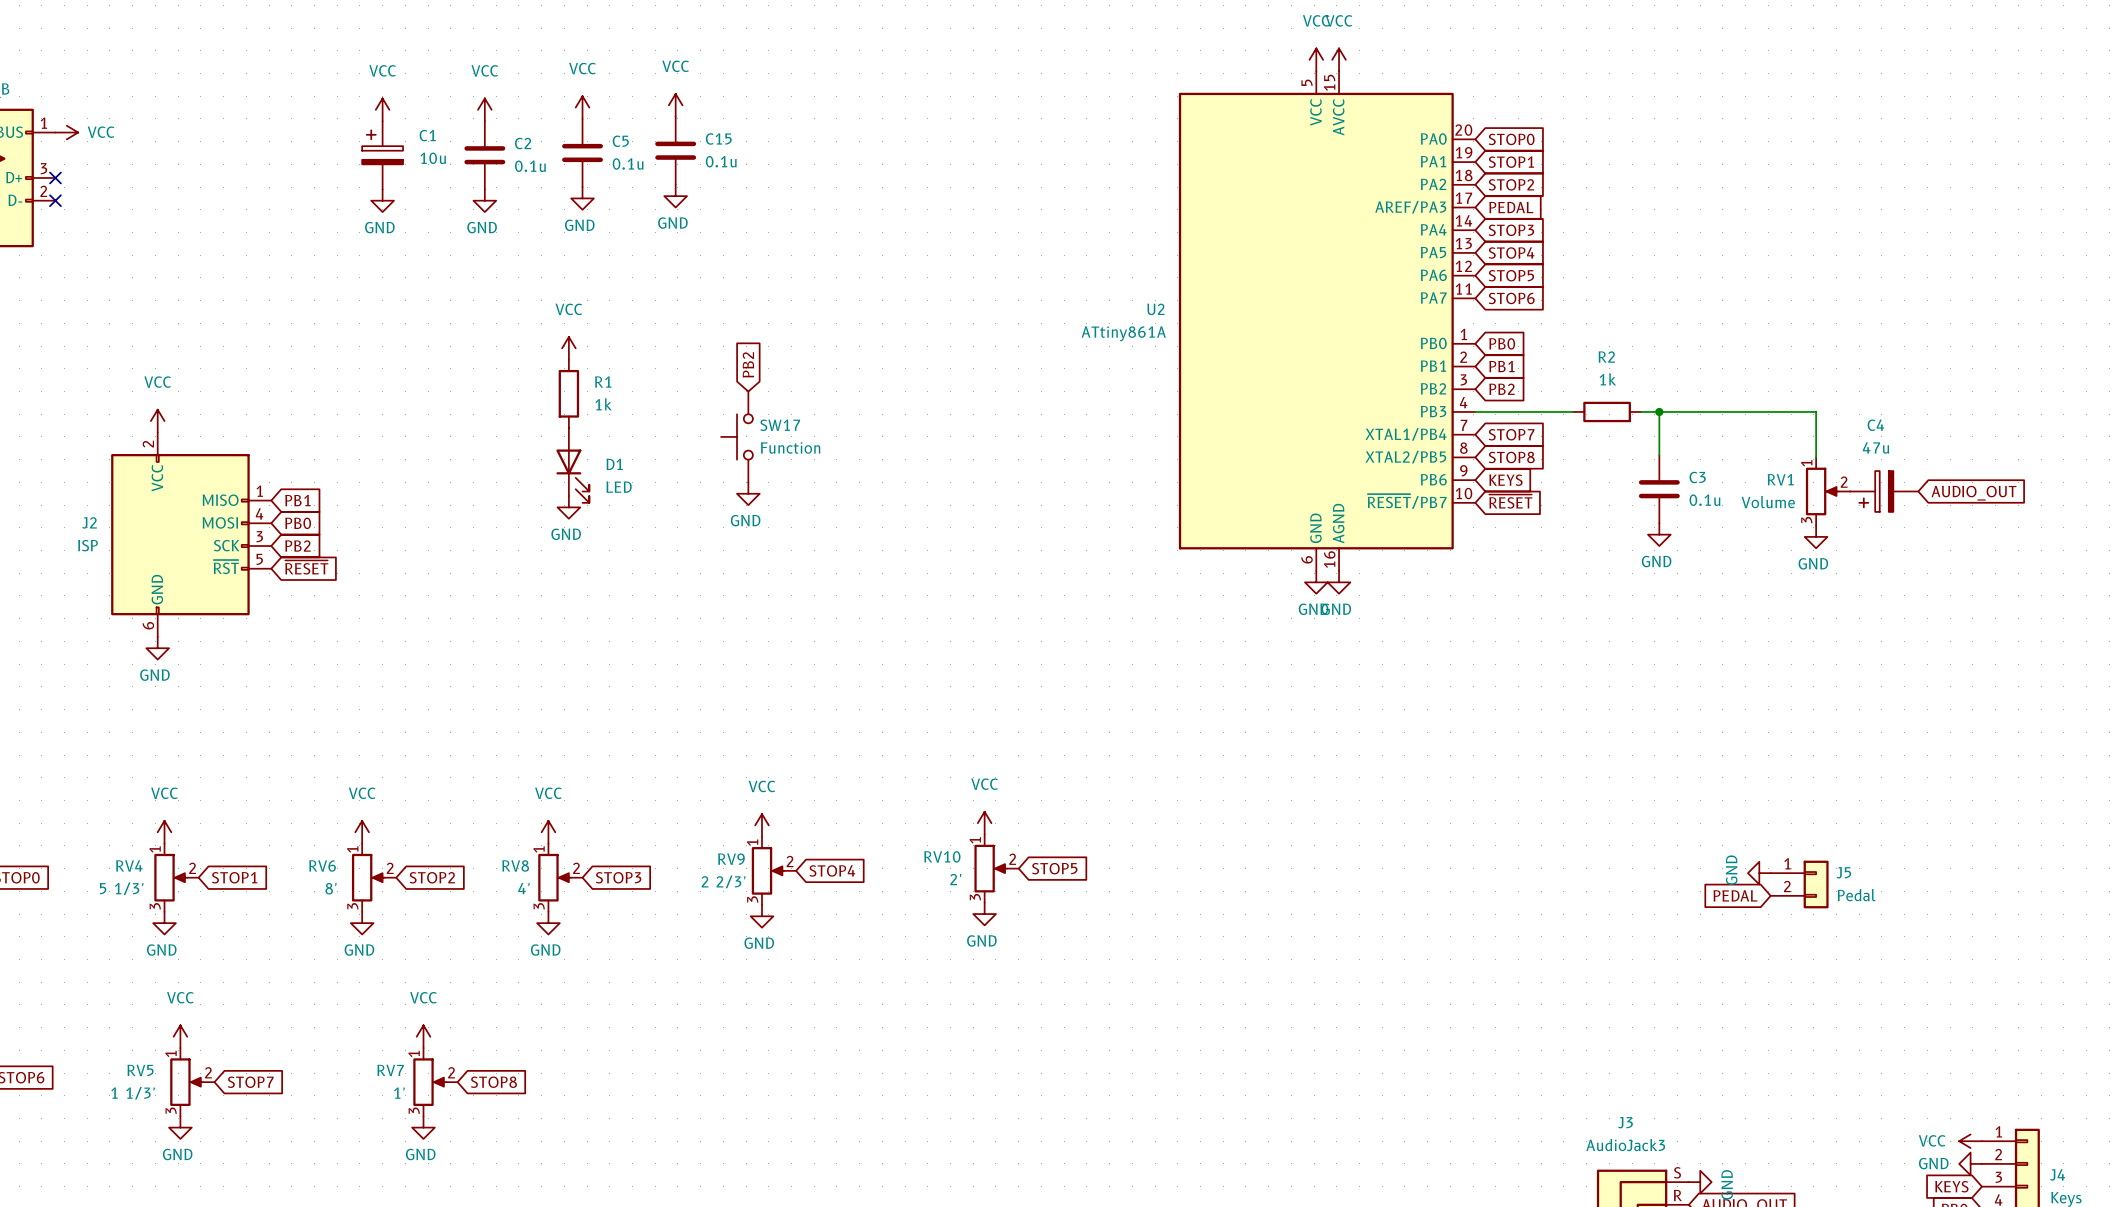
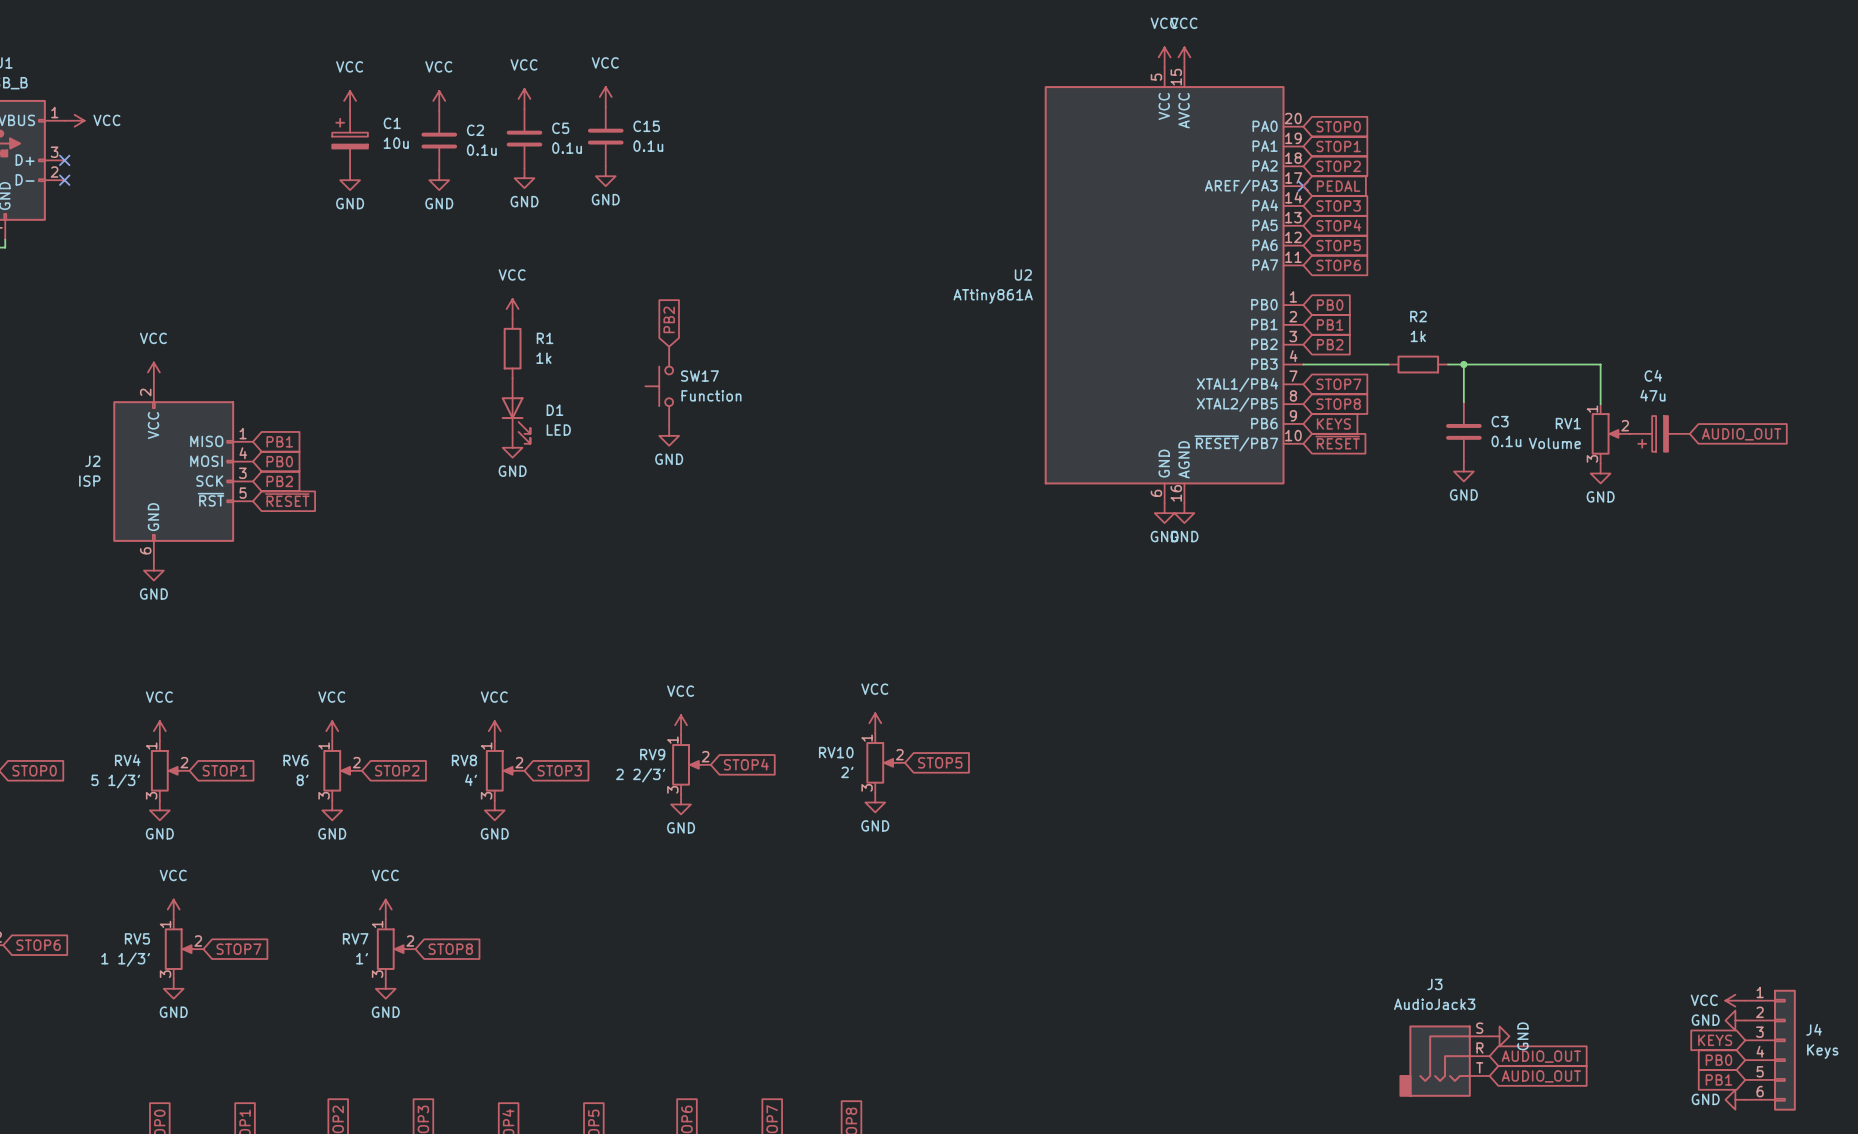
no-connect mark: none -> (1303, 186)
power symbol: GND (1759, 873) -> none
J5: Pedal (1799, 884) -> none
global label: PEDAL (1735, 895) -> none

